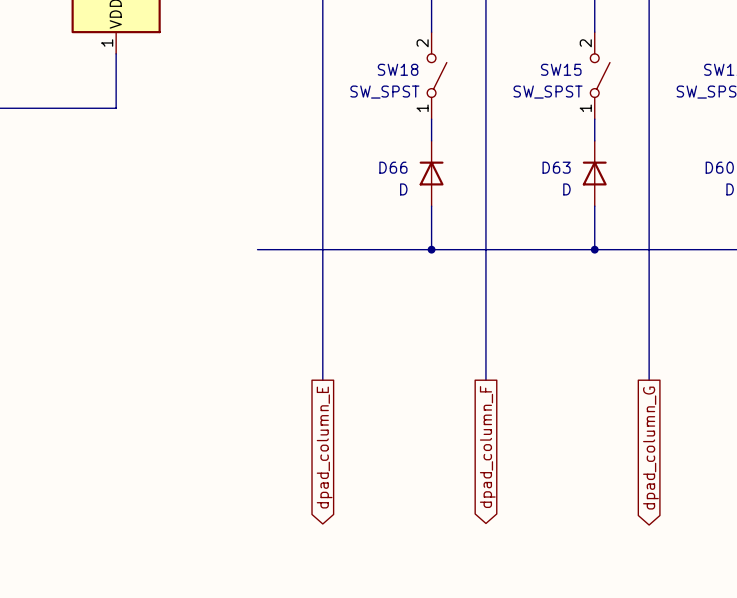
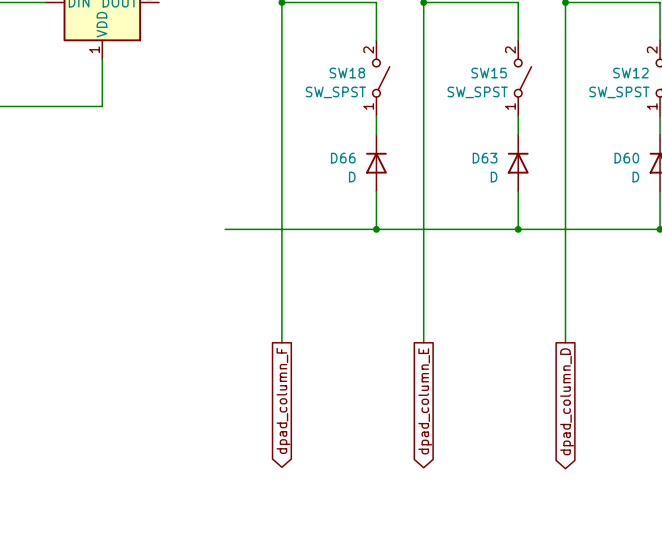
global label: dpad_column_E (324, 447) -> dpad_column_F (283, 400)
global label: dpad_column_F (487, 447) -> dpad_column_E (425, 401)
global label: dpad_column_G (650, 448) -> dpad_column_D (567, 401)

